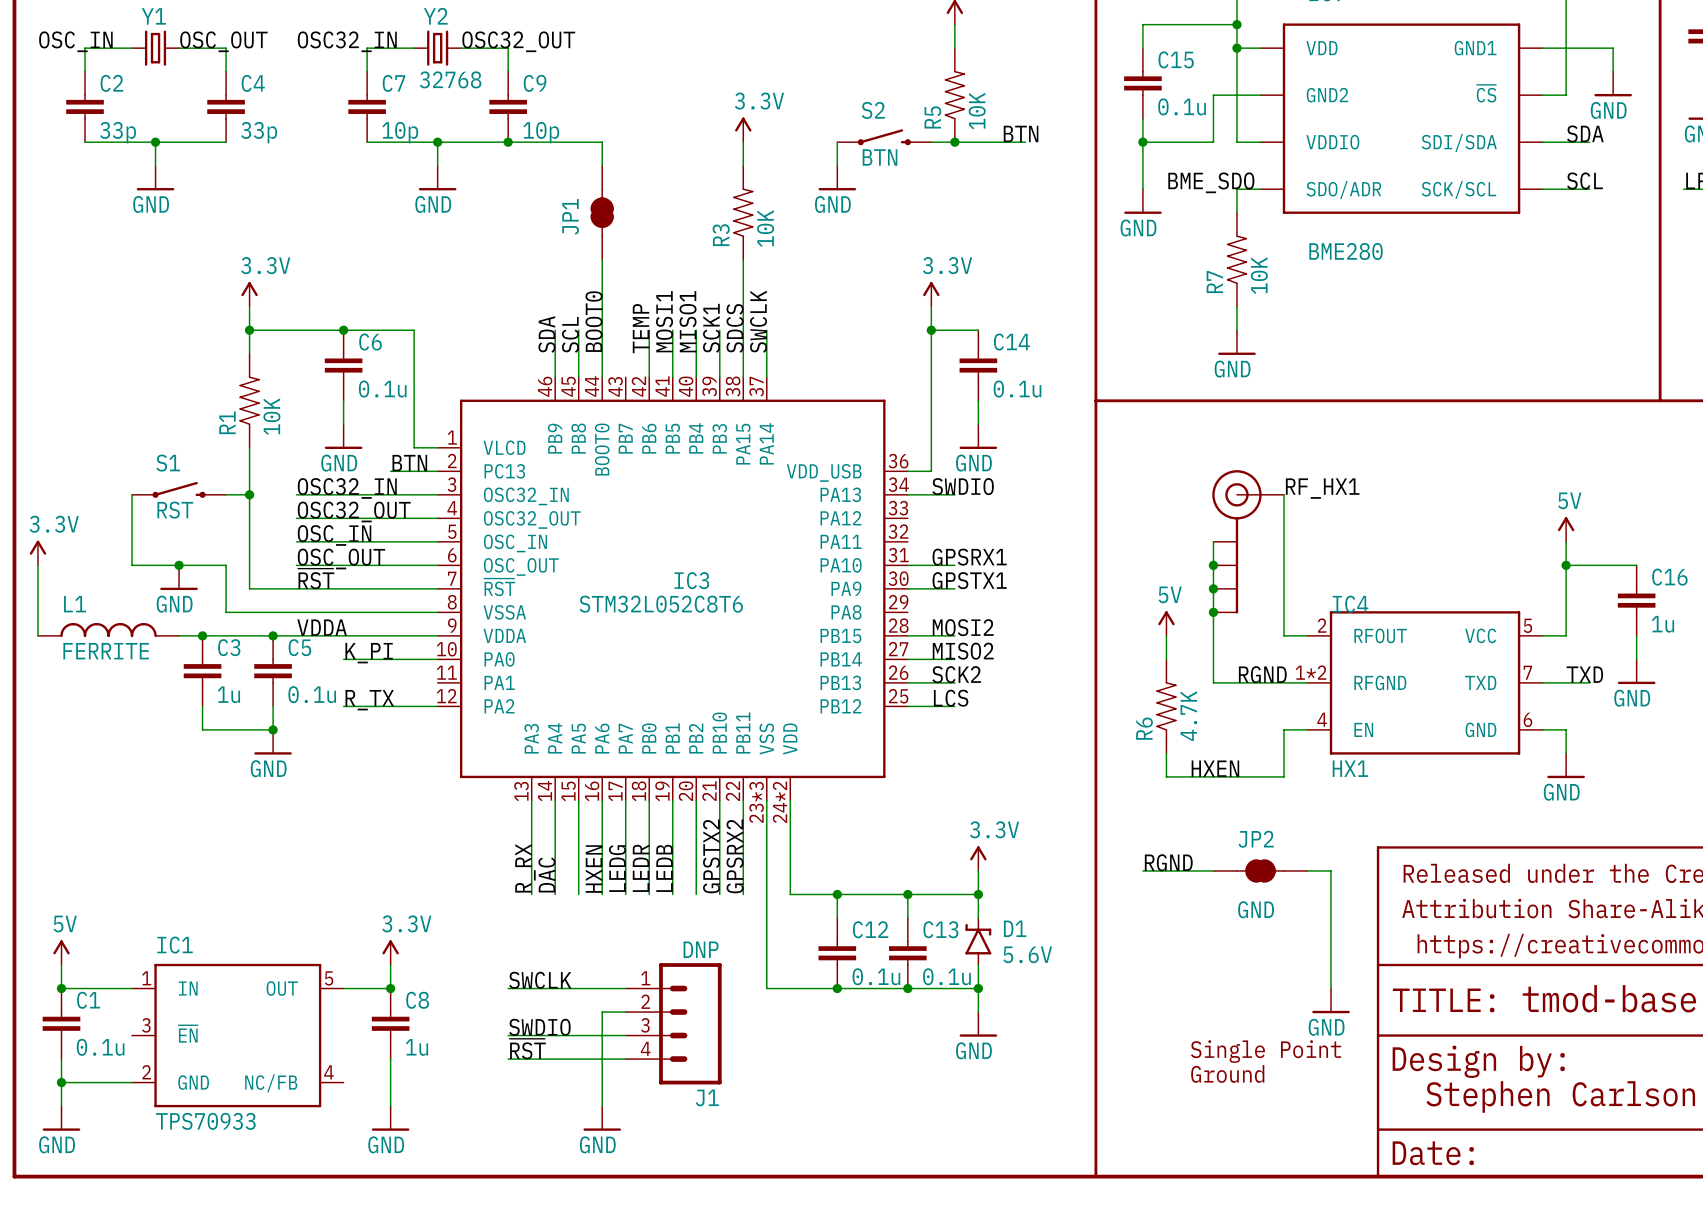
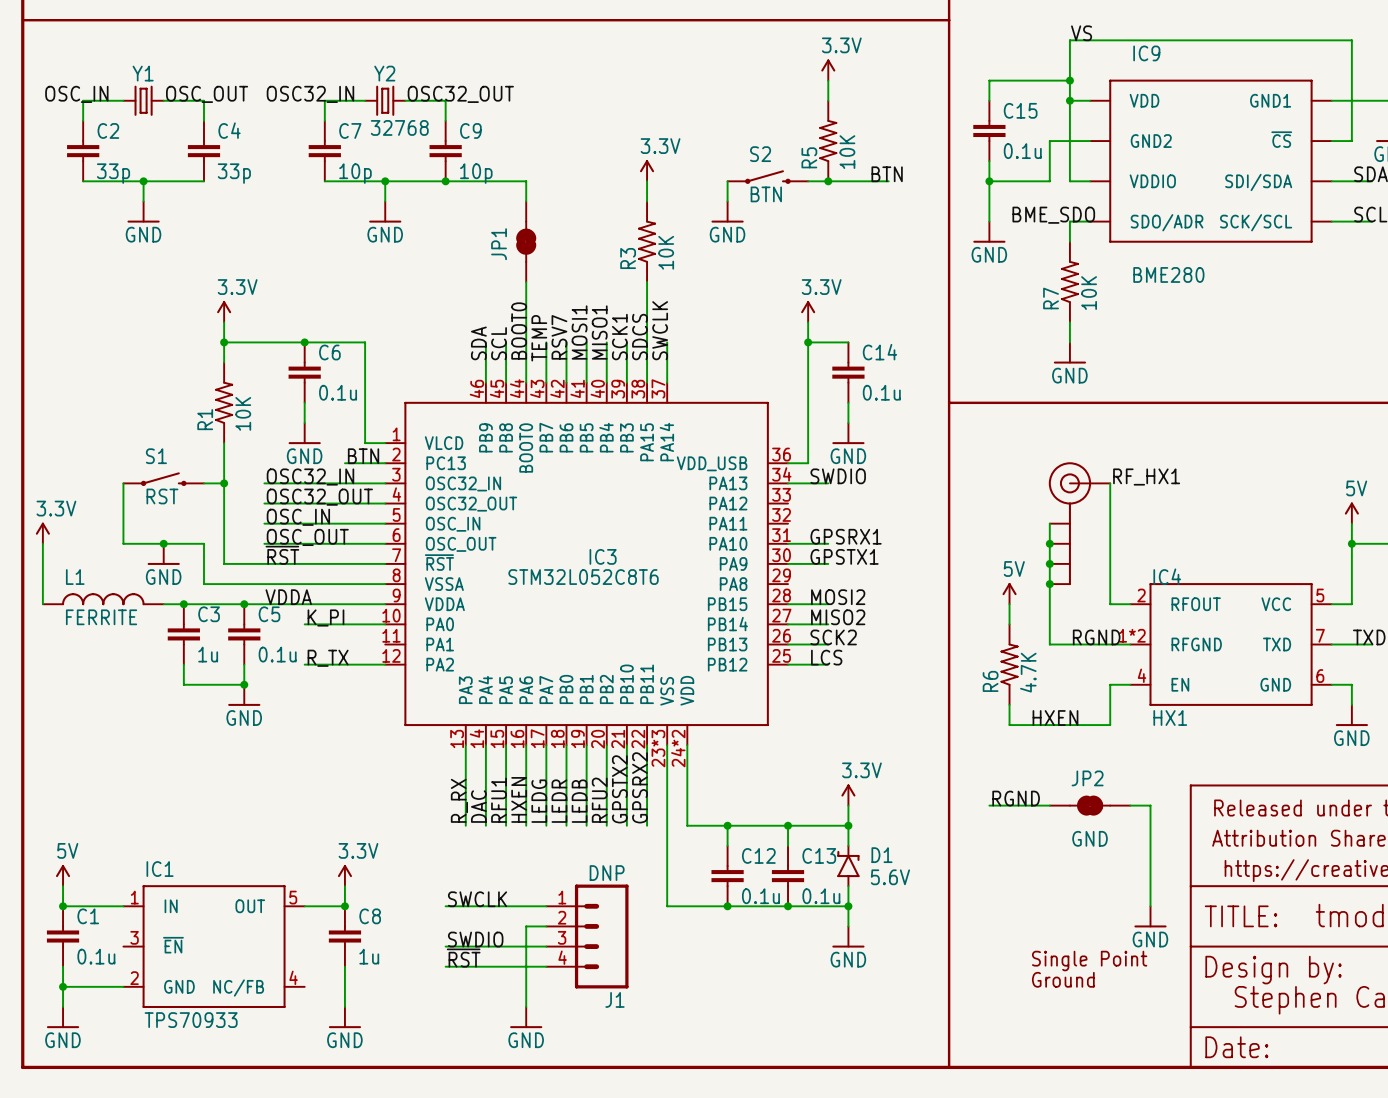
label: none -> TEMP (539, 338)
label: TEMP (641, 328) -> RSV7 (559, 337)
wire: none -> (546, 342) (546, 382)
label: none -> RFU1 (499, 800)
label: none -> RFU2 (599, 800)

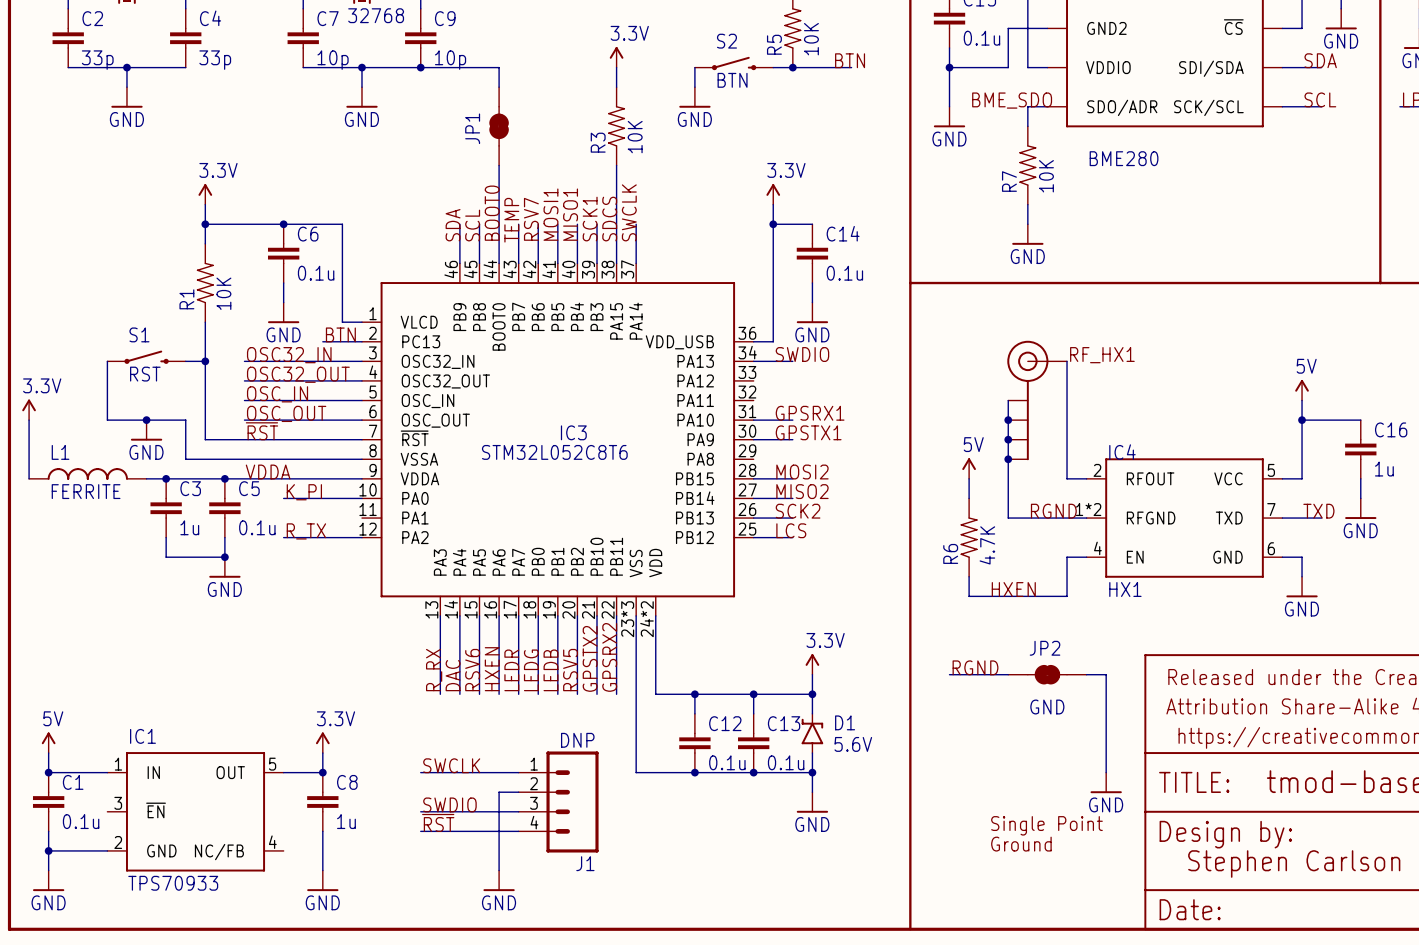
label: RFU1 (499, 800) -> RSV6 (472, 670)
label: RFU2 (599, 800) -> RSV5 (570, 670)
label: LEDG (539, 801) -> LEDR (511, 670)
label: LEDR (559, 801) -> LEDG (531, 670)

